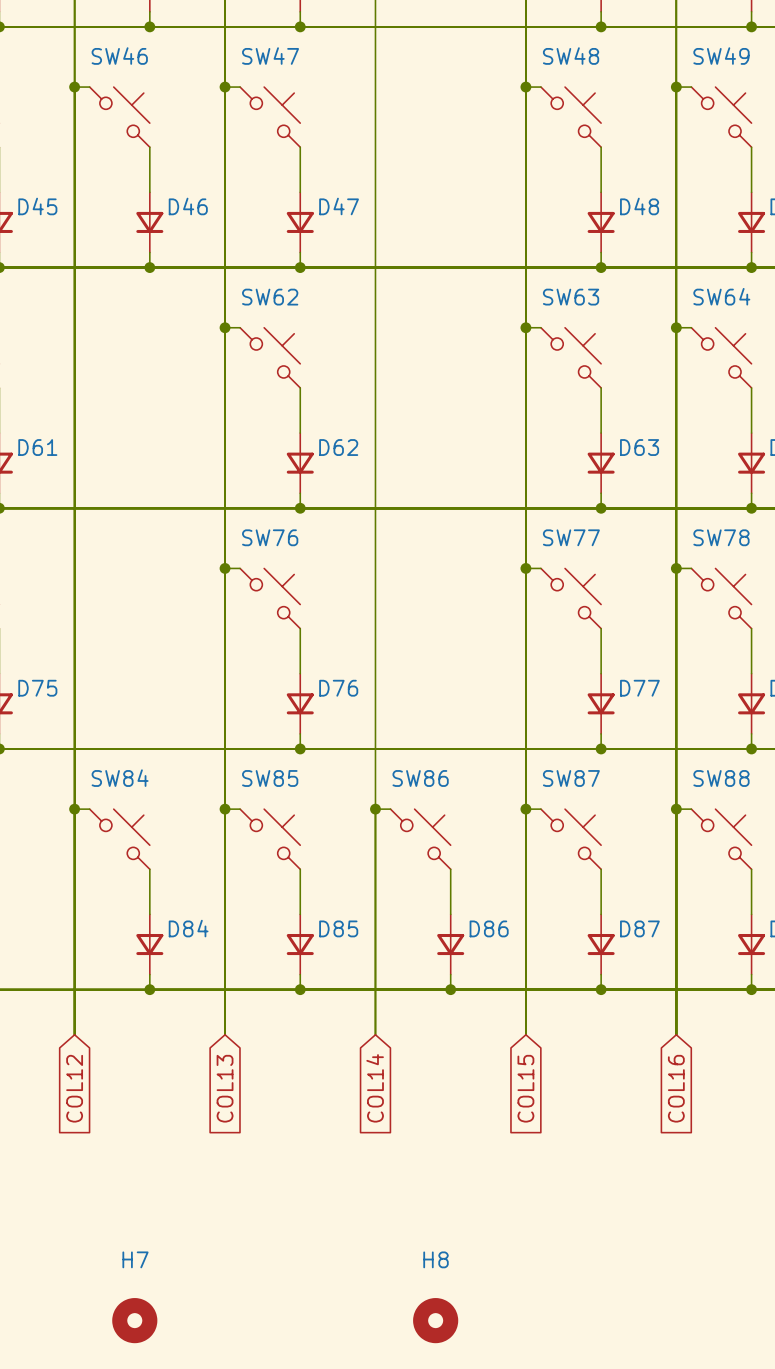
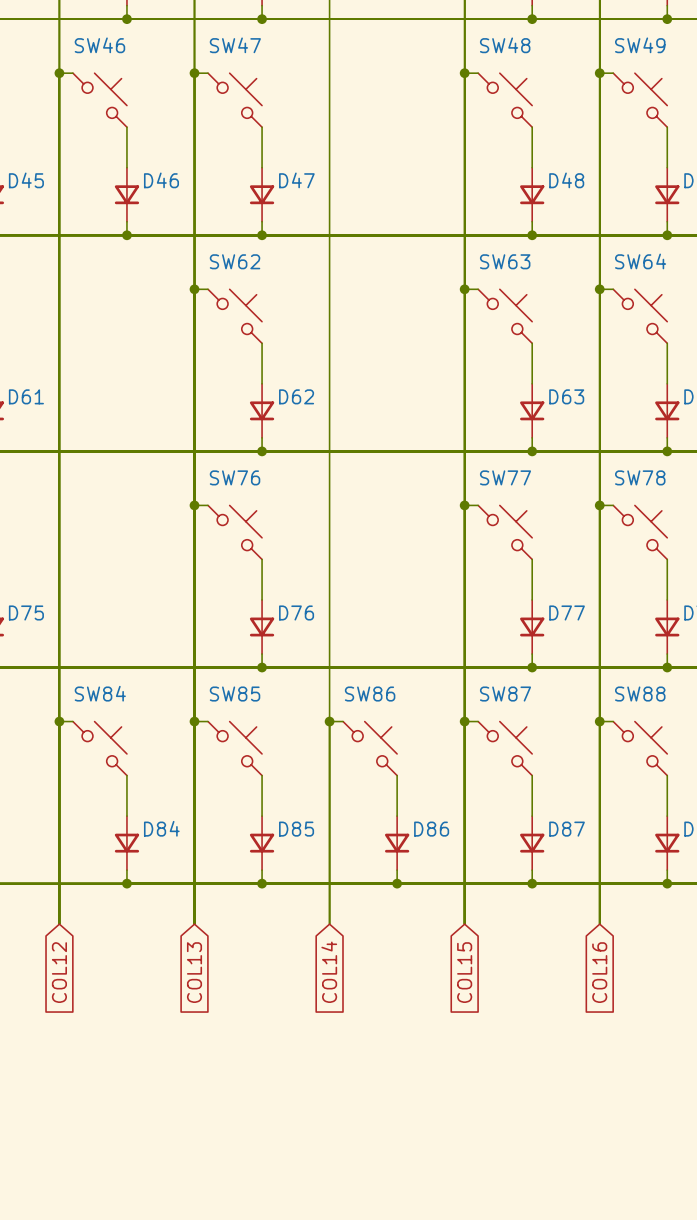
H7: (134, 1320) -> none
H8: (435, 1320) -> none

